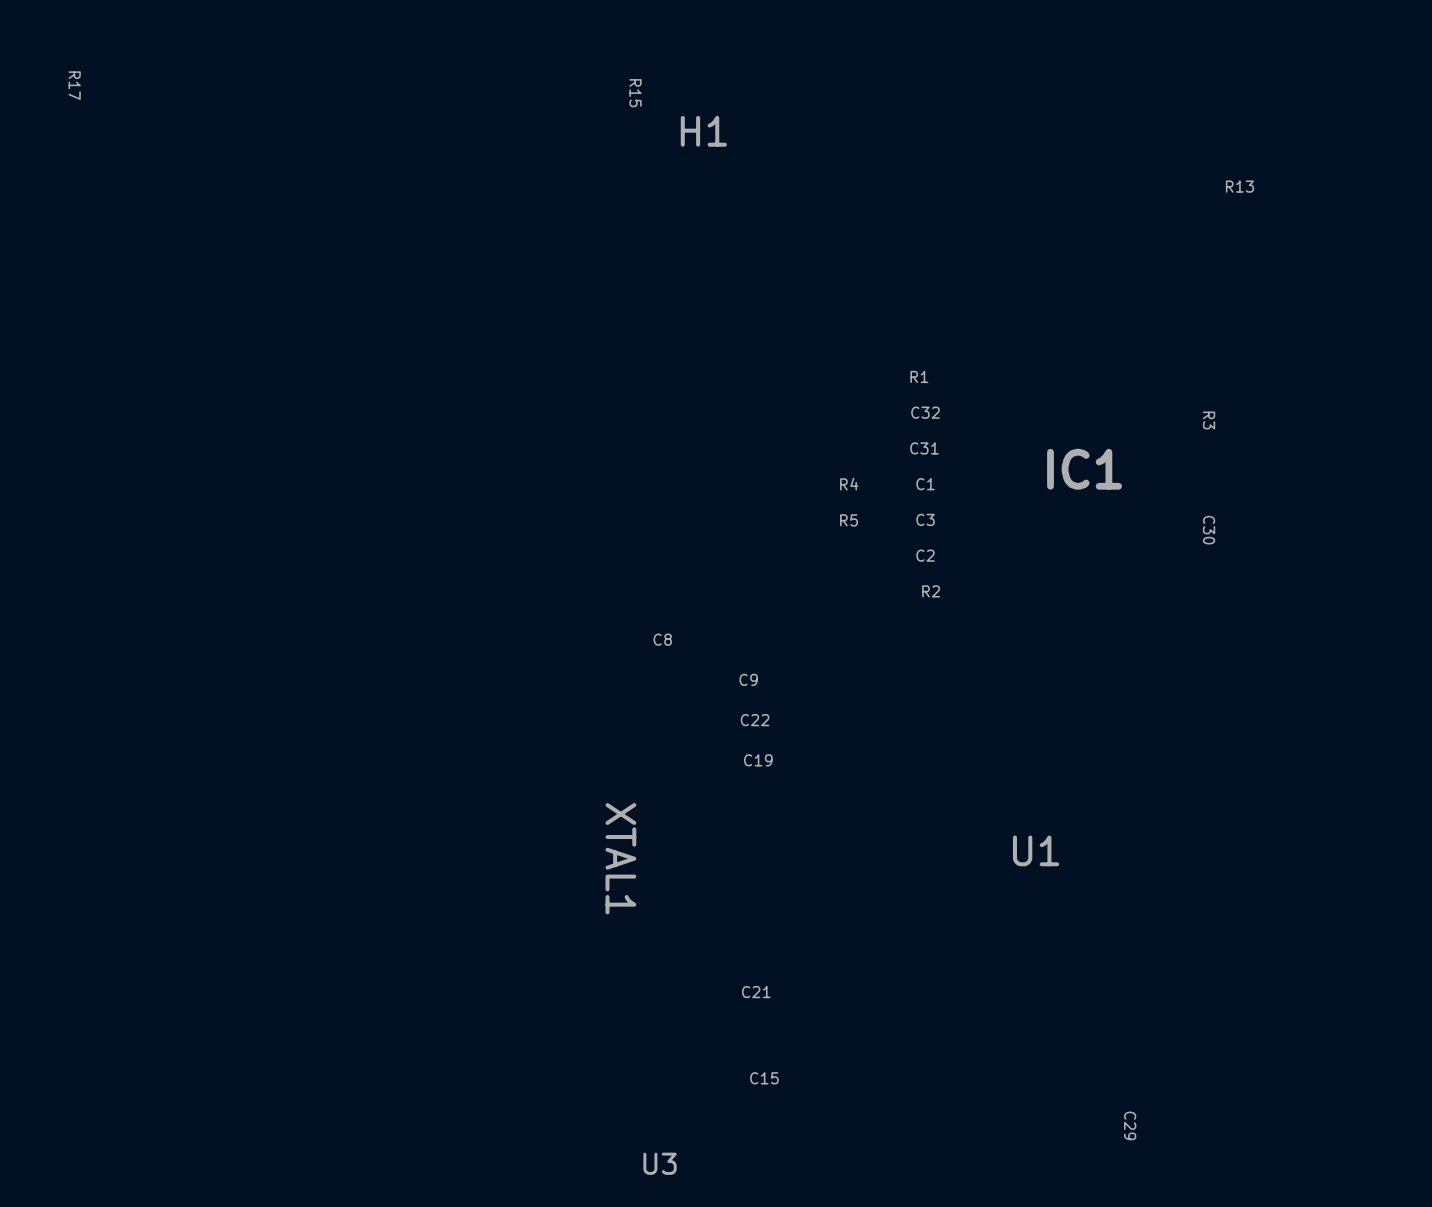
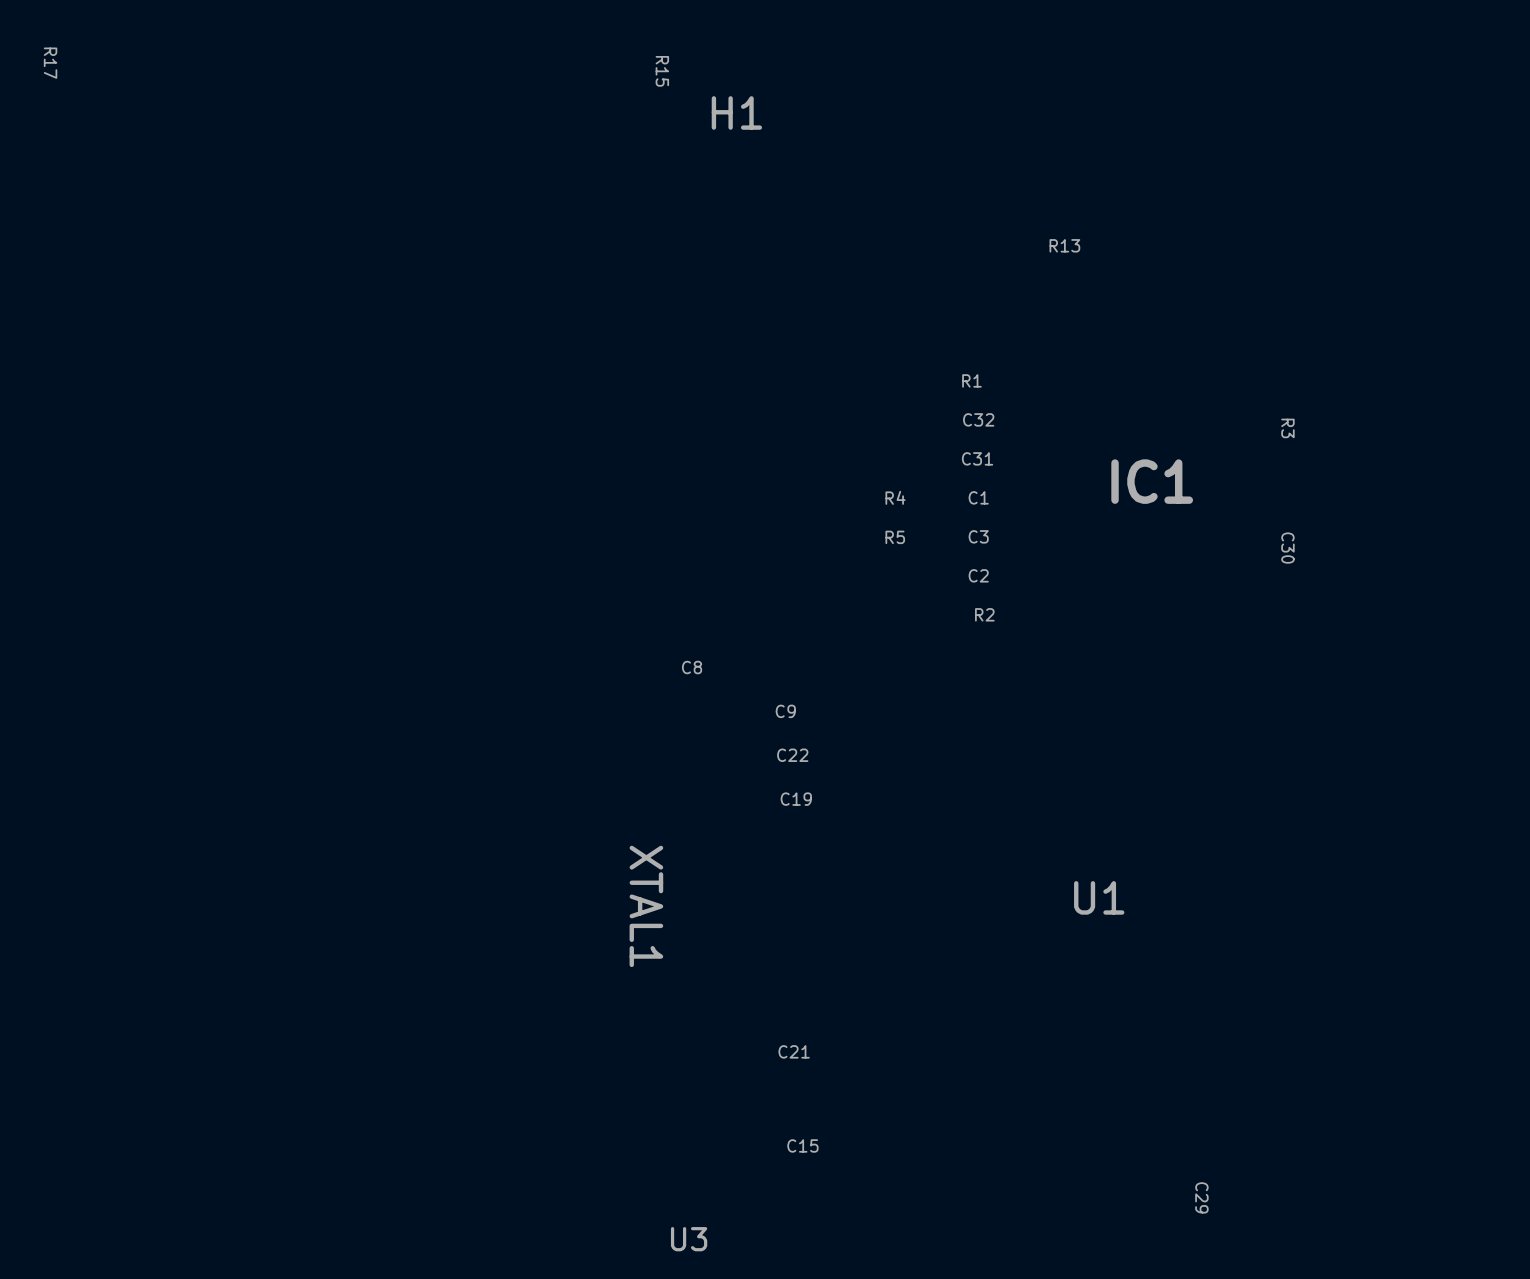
R13 position: (1239, 186) -> (1064, 245)

